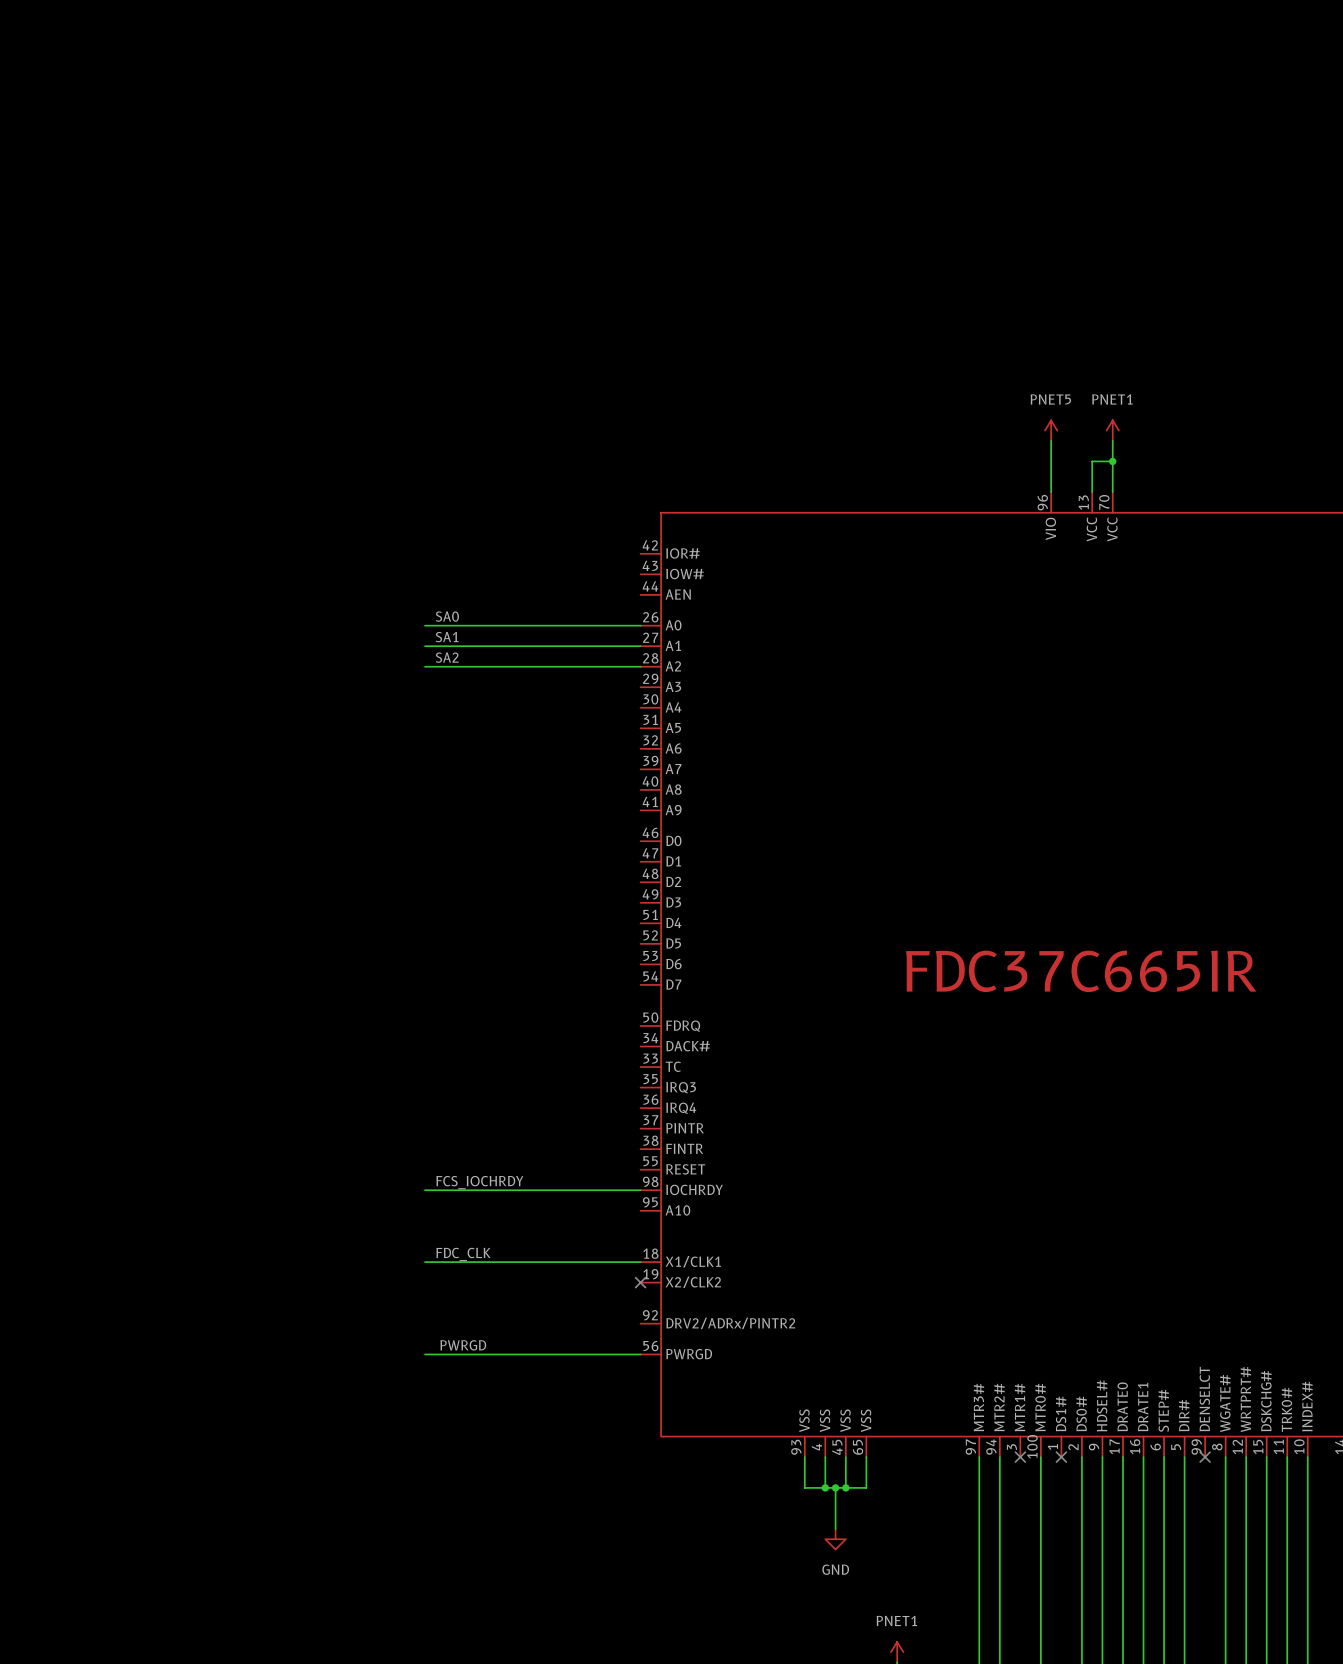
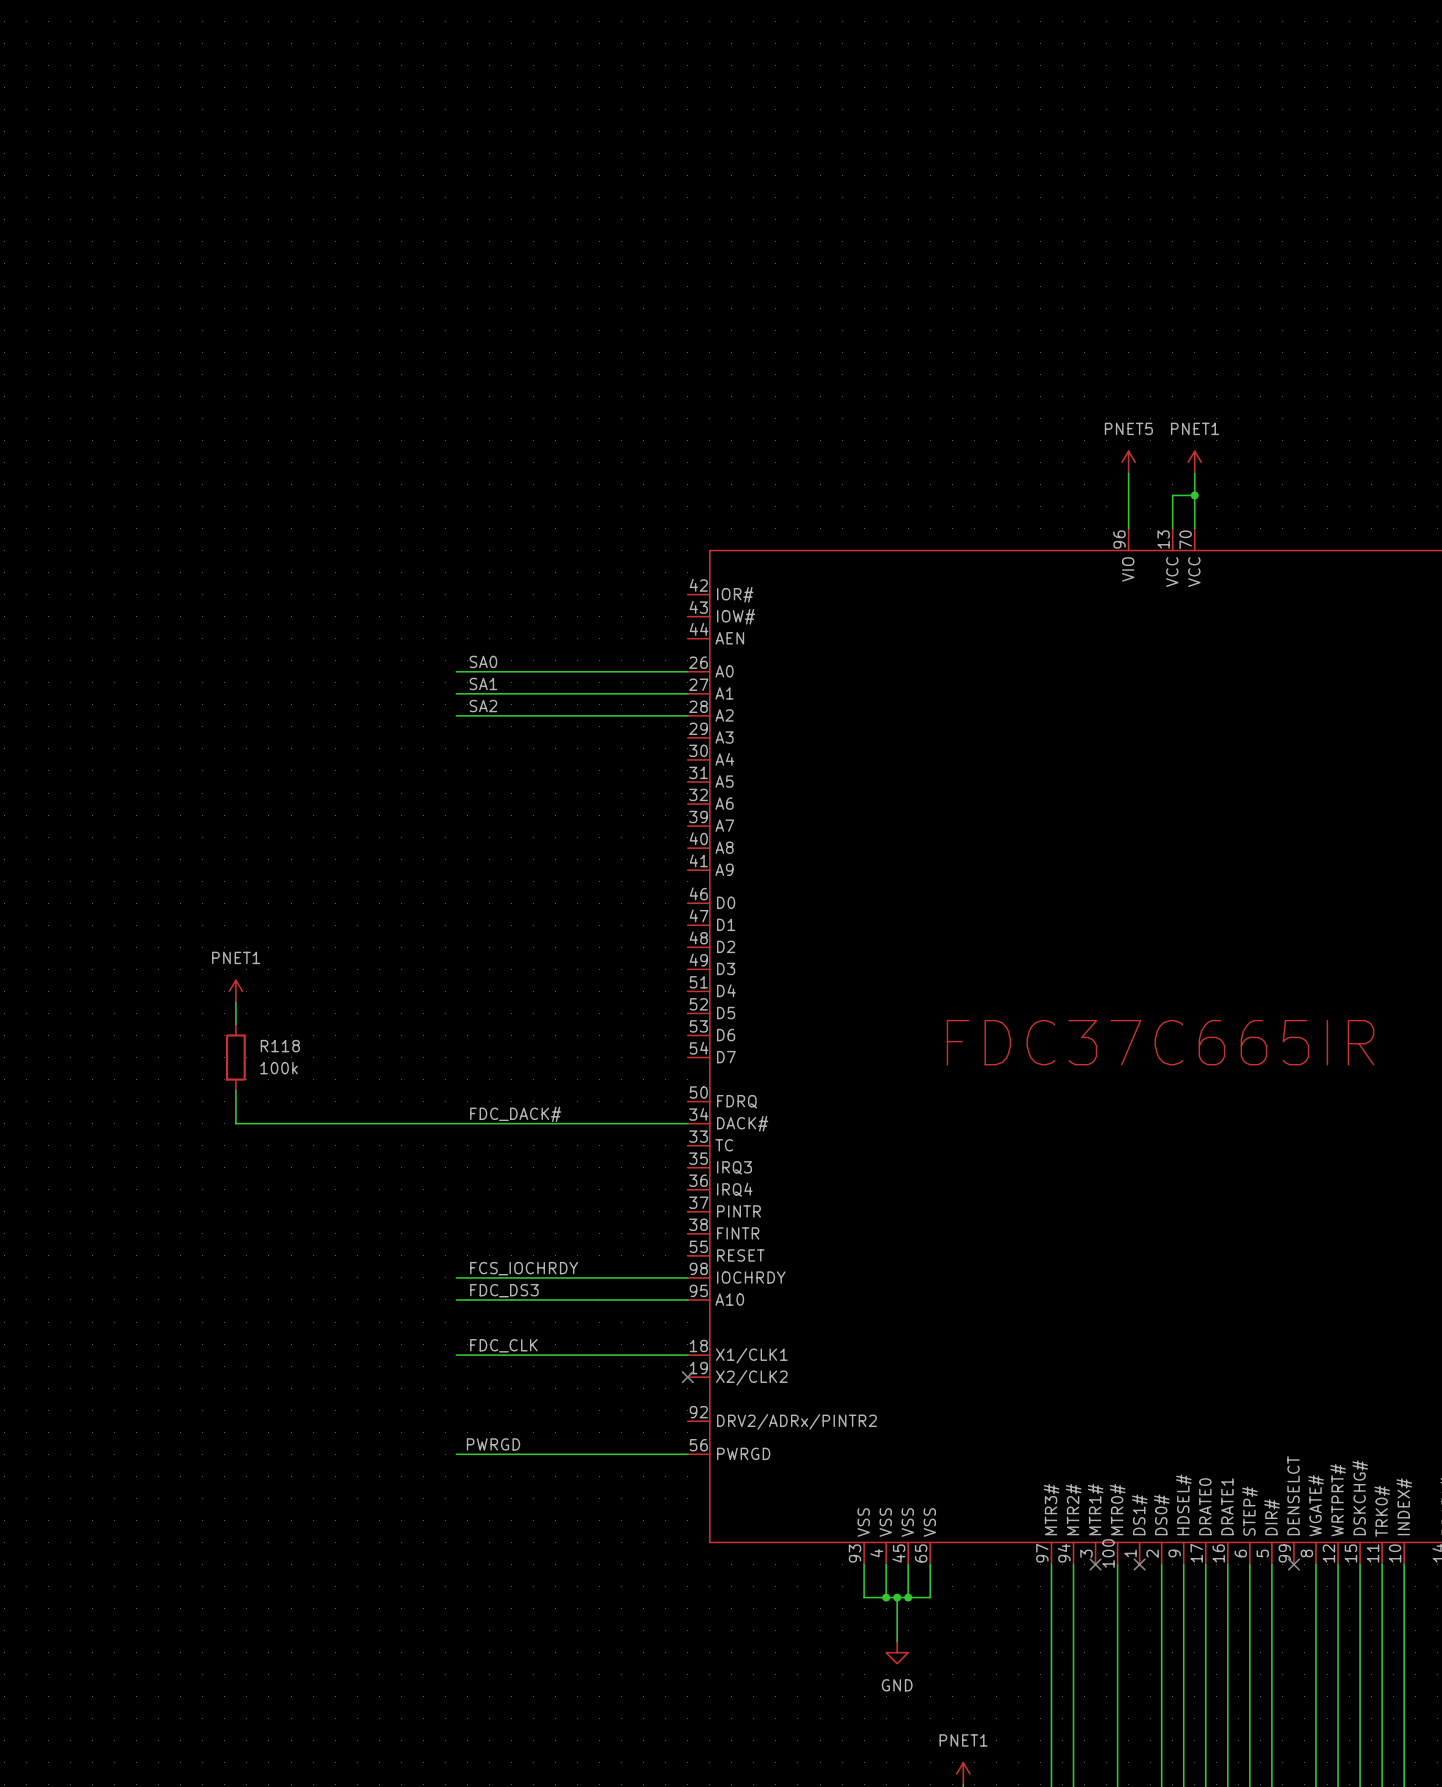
power symbol: none -> PNET1 (235, 991)
wire: none -> (235, 1002) (235, 1024)
R118: none -> 100k (235, 1057)
wire: none -> (235, 1090) (235, 1123) (687, 1123)
label: none -> FDC_DACK# (515, 1114)
label: none -> FDC_DS3 (504, 1290)
wire: none -> (456, 1299) (687, 1299)

